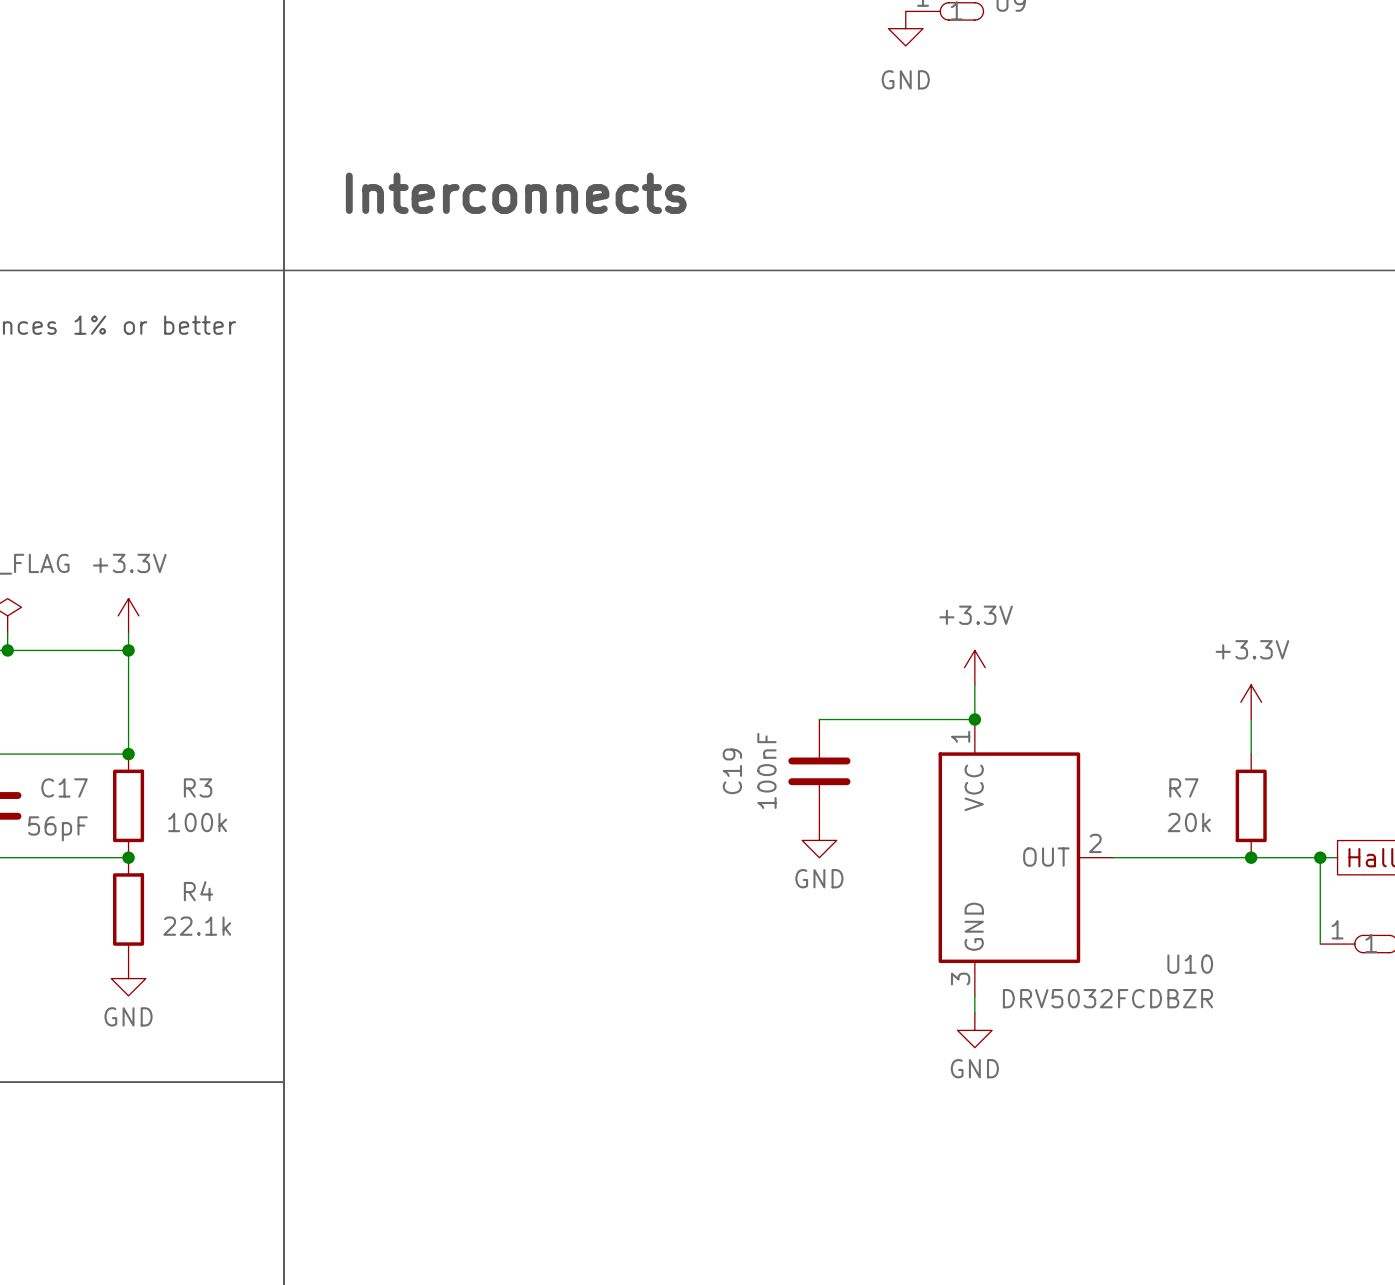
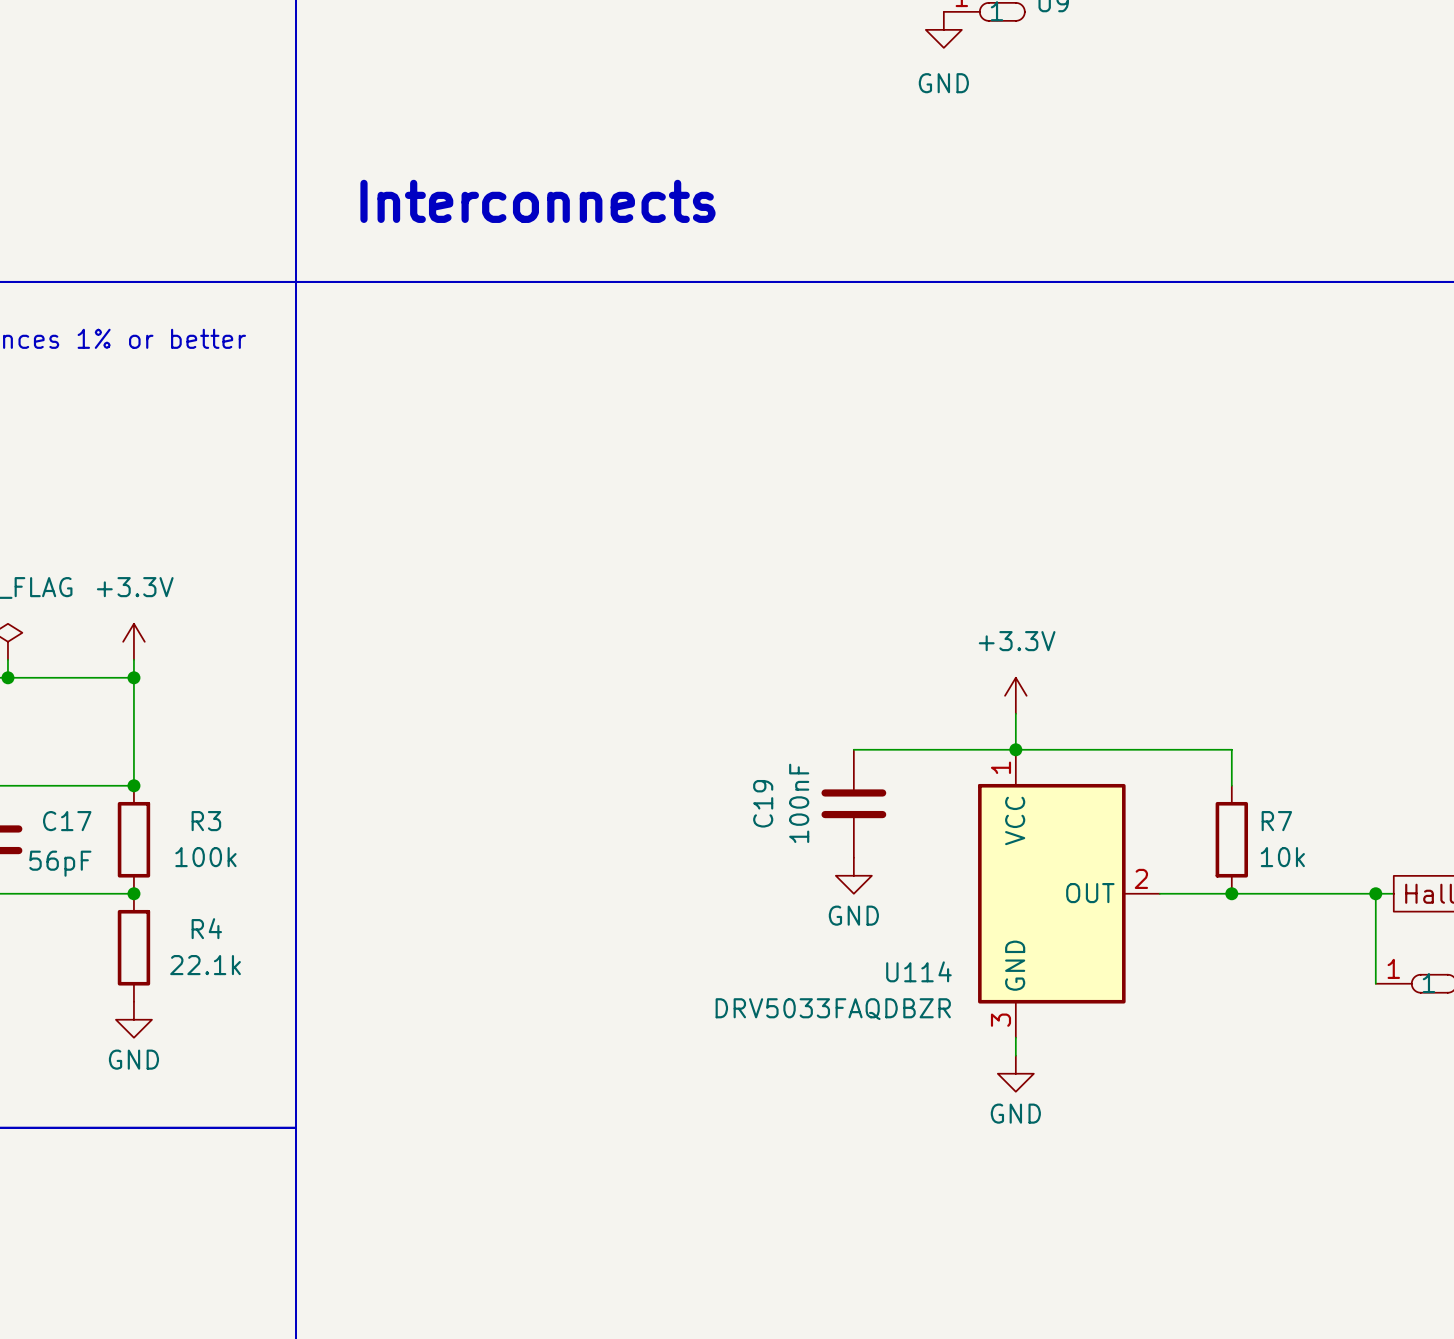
power symbol: +3.3V (1251, 702) -> none
wire: none -> (1015, 749) (1231, 749) (1231, 785)
wire: (1251, 719) (1251, 754) -> none
R7 name position: R7 (1183, 787) -> R7 (1276, 821)
R7 position: (1251, 805) -> (1231, 839)
R7 value: 20k (1189, 822) -> 10k (1282, 857)
junction position: (1251, 857) -> (1231, 893)
U10 name: U10 (1190, 964) -> U114 (918, 971)
U10 value: DRV5032FCDBZR (1107, 998) -> DRV5033FAQDBZR (833, 1009)

